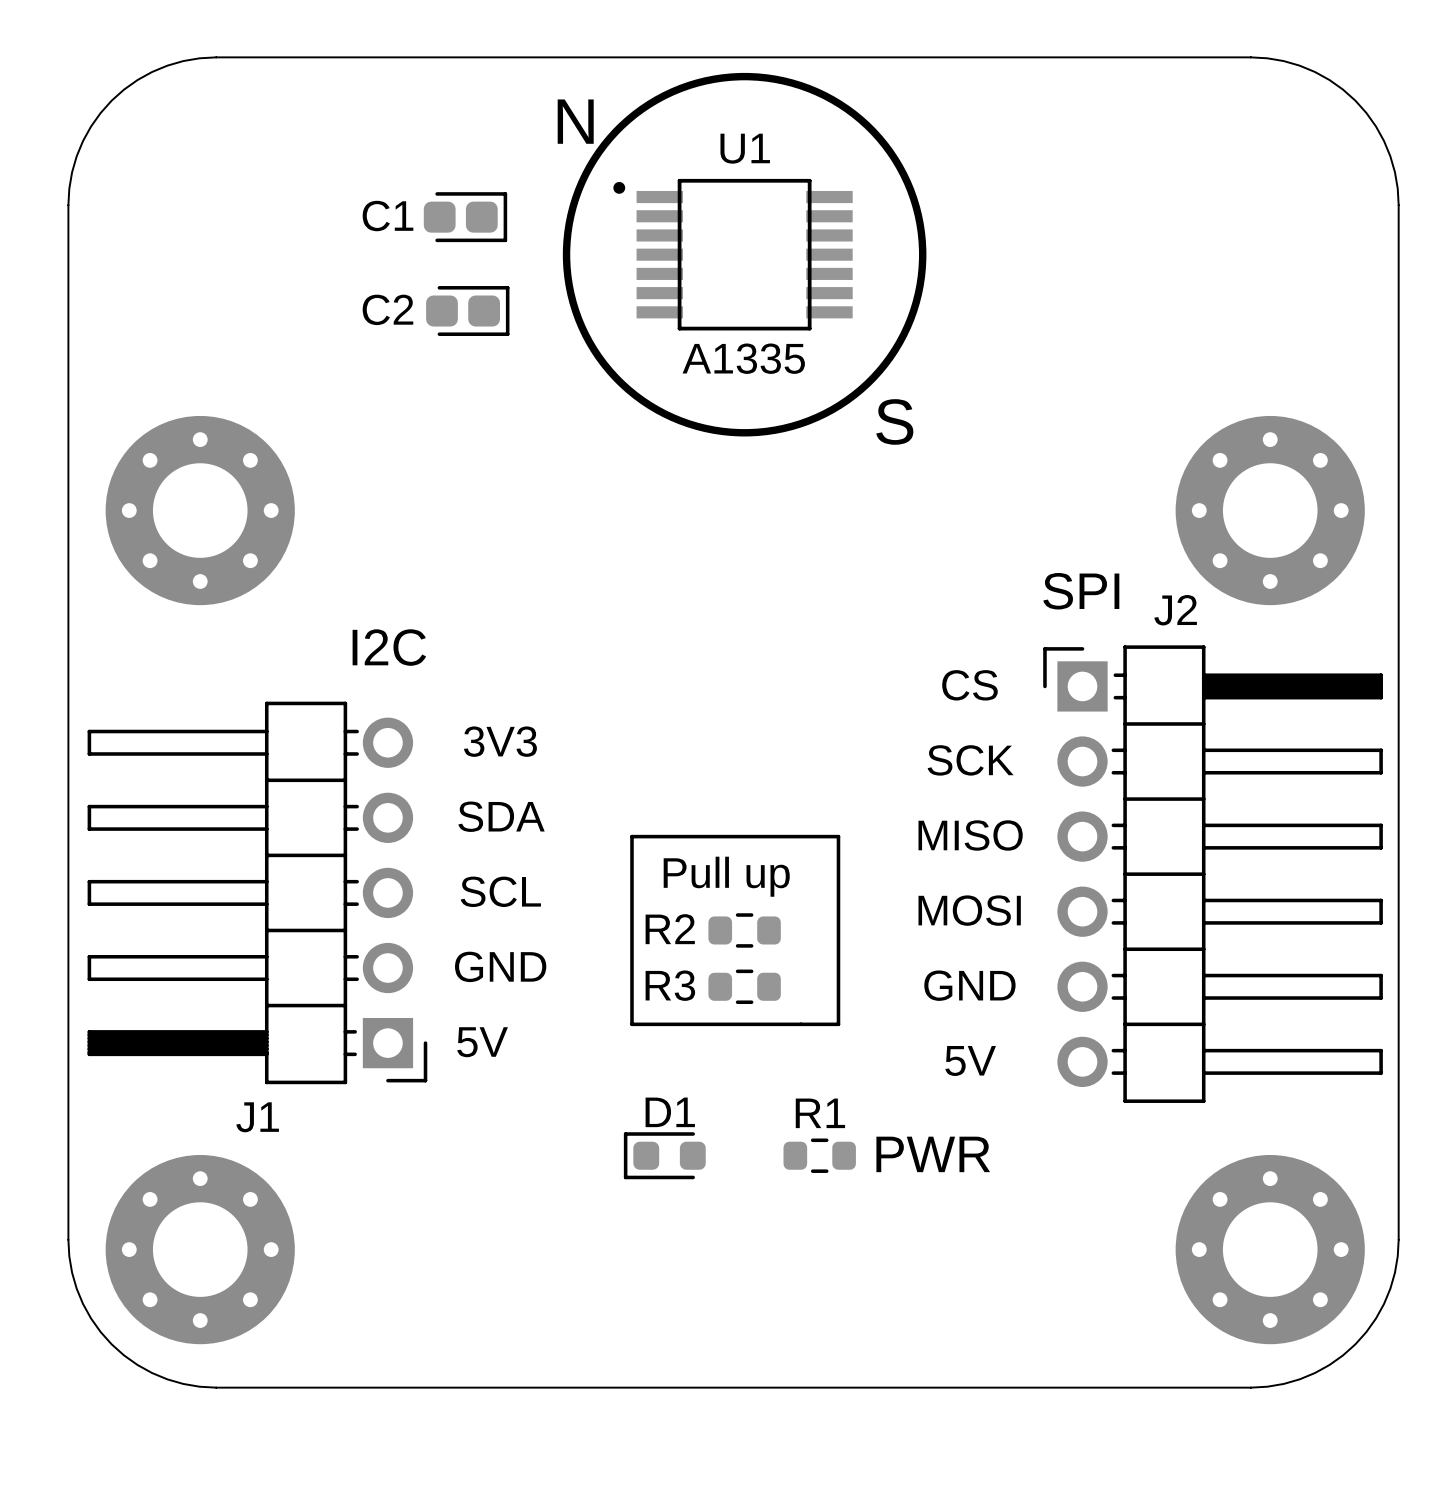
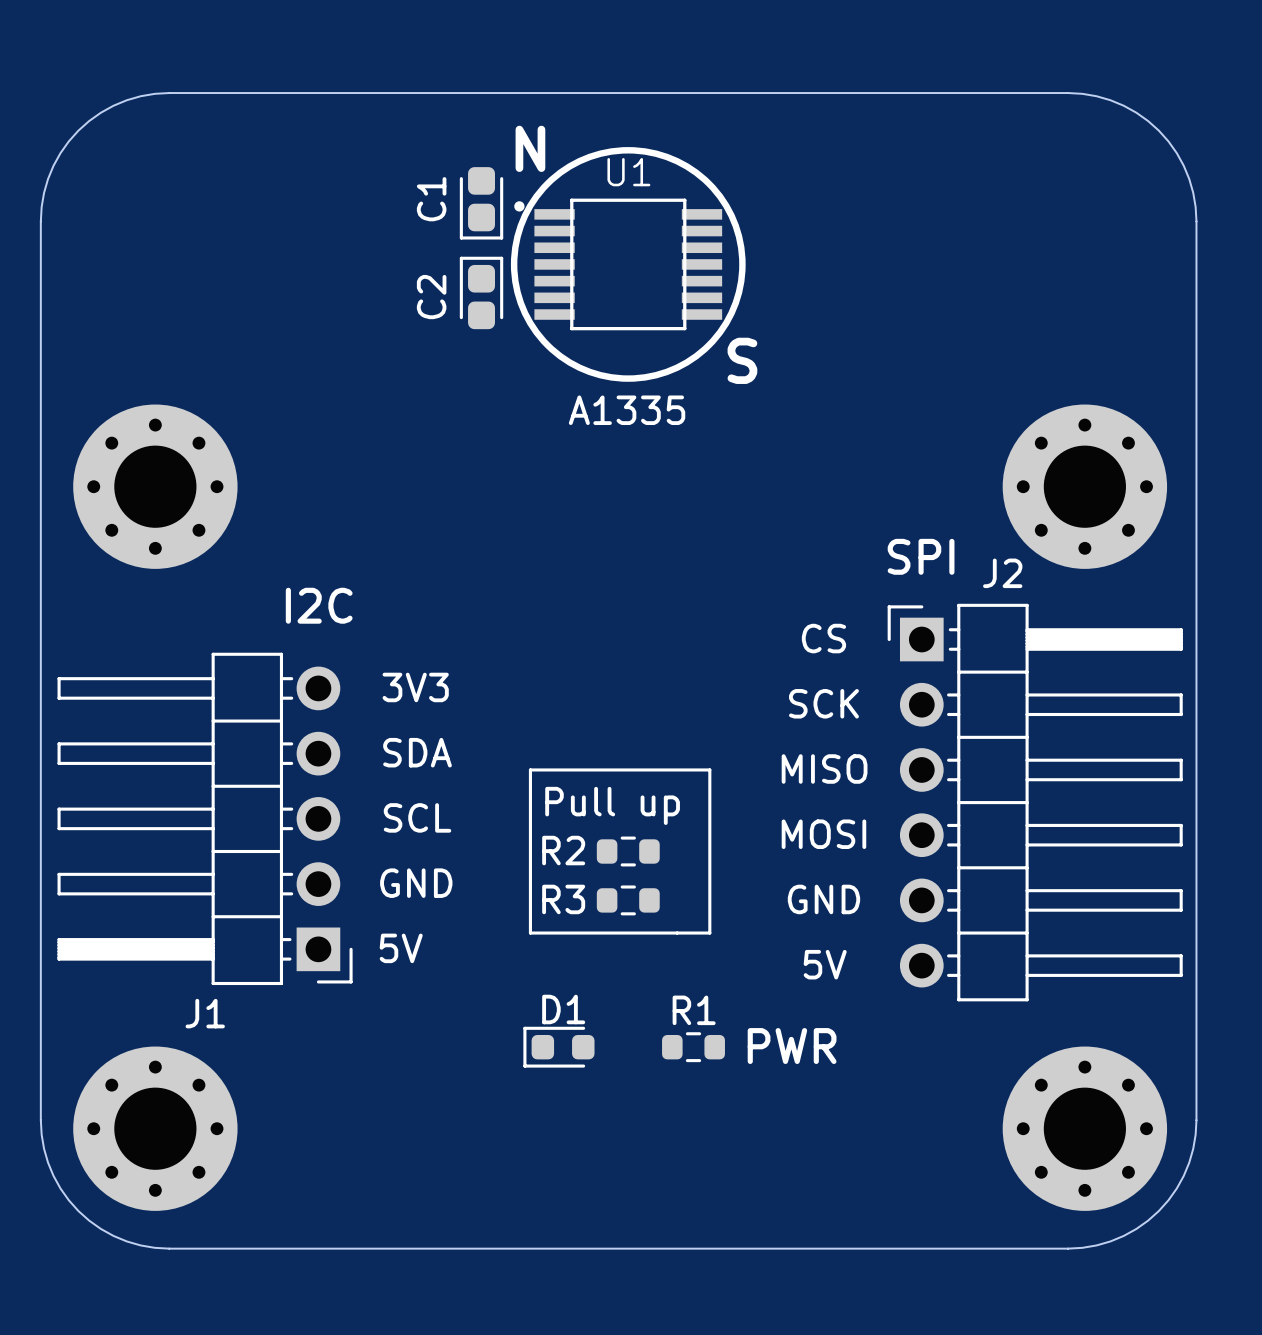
drawing shape: [562, 72, 927, 437] -> [510, 147, 746, 382]
text position: N (575, 121) -> N (530, 148)
C1 rotation: 0° (465, 217) -> 90° clockwise (481, 203)
C1 position: (465, 217) -> (481, 203)
C2 rotation: 0° (467, 311) -> 90° counterclockwise (481, 292)
C2 position: (467, 311) -> (481, 292)
U1 value position: A1335 (743, 358) -> A1335 (627, 410)
text position: S (894, 421) -> S (742, 360)

